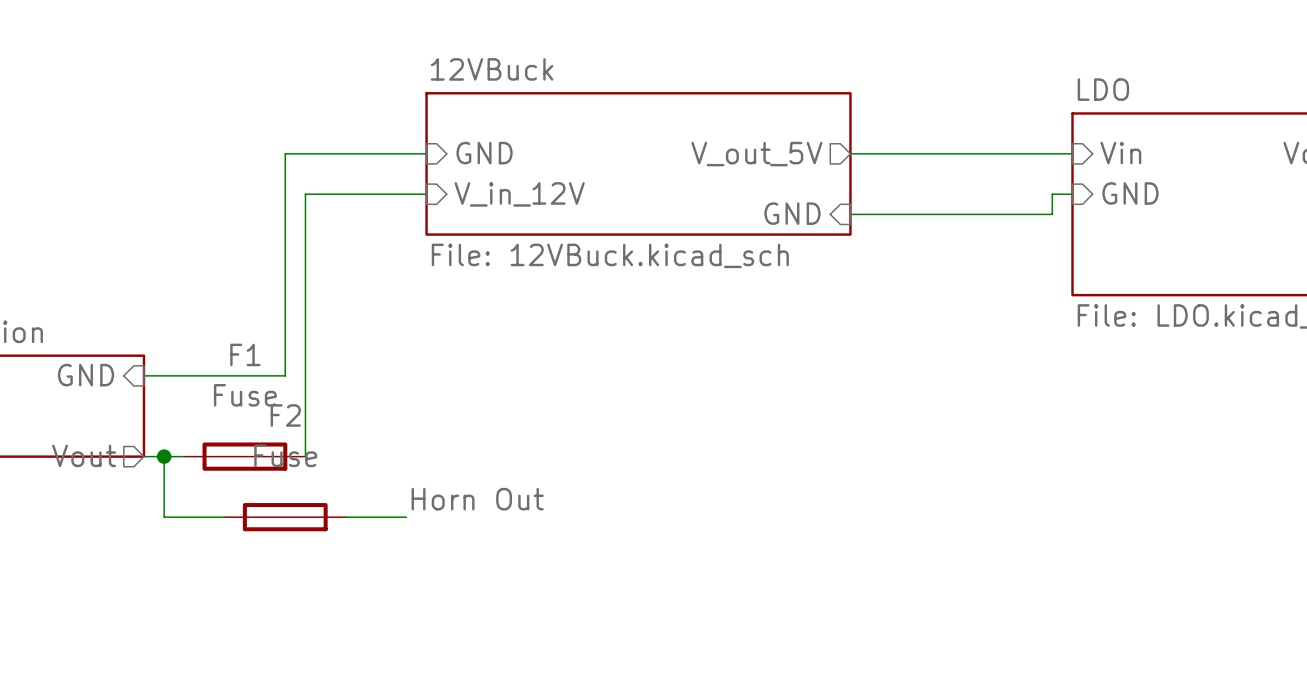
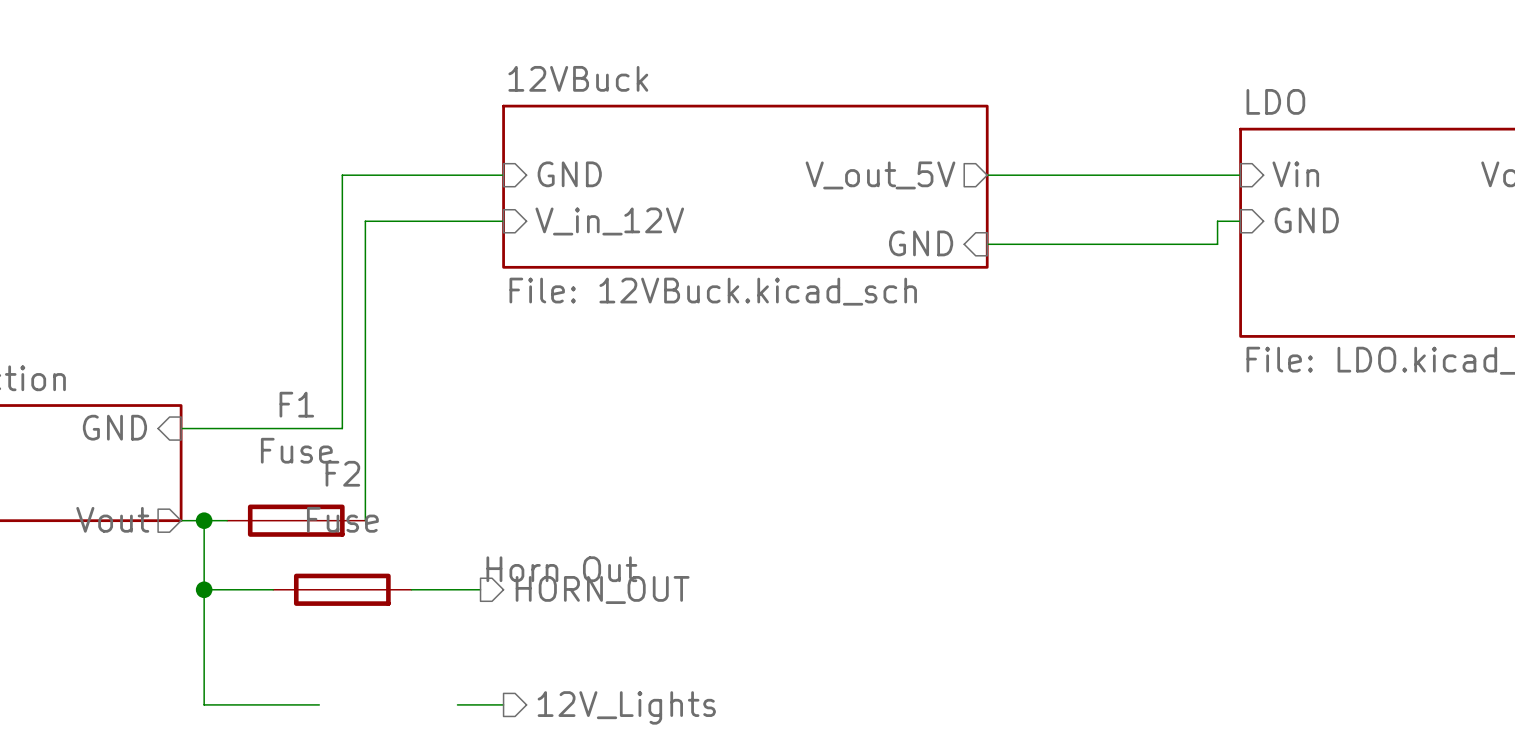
wire: none -> (204, 589) (204, 704) (319, 704)
junction: none -> (204, 589)
hierarchical label: none -> HORN_OUT (602, 590)
wire: none -> (457, 704) (503, 704)
hierarchical label: none -> 12V_Lights (626, 707)

